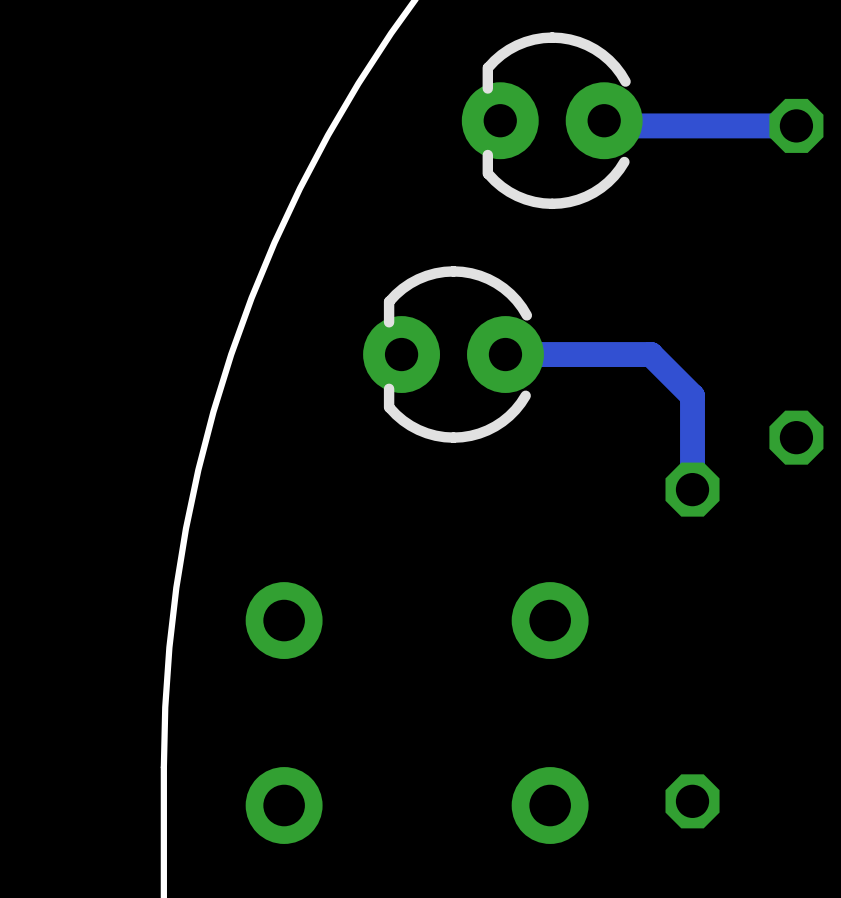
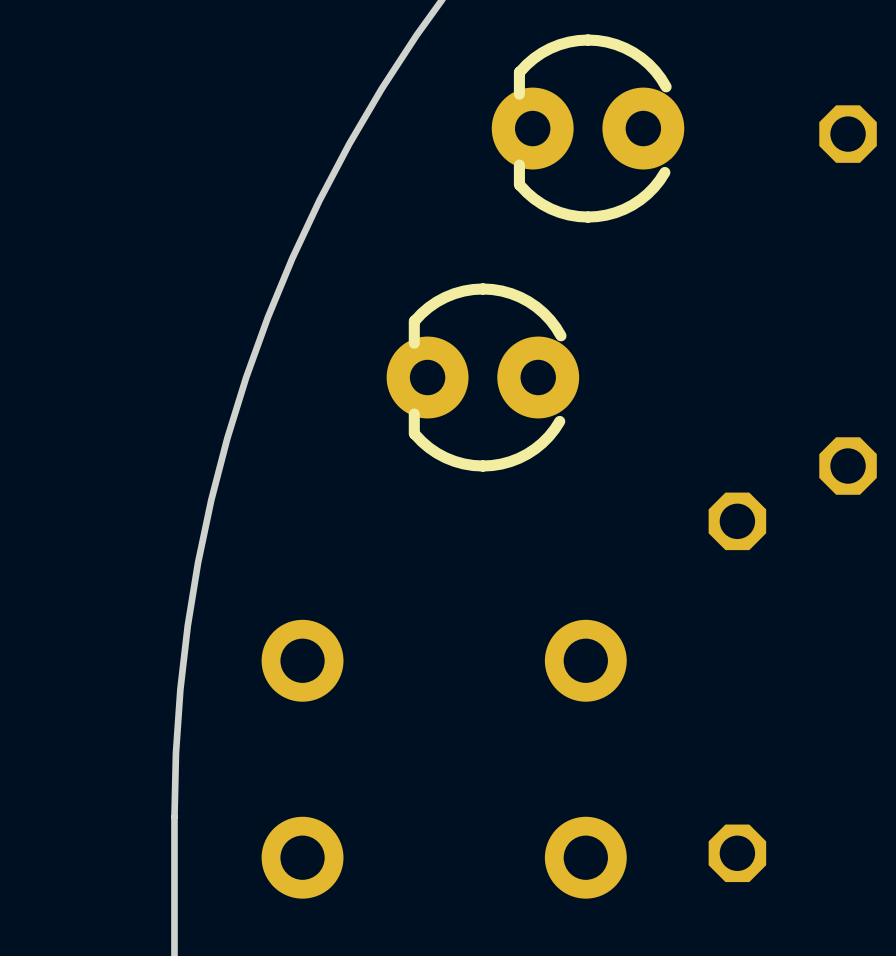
track: (604, 120) (609, 125) (796, 125) -> none
track: (505, 354) (650, 354) (692, 396) (692, 489) -> none

